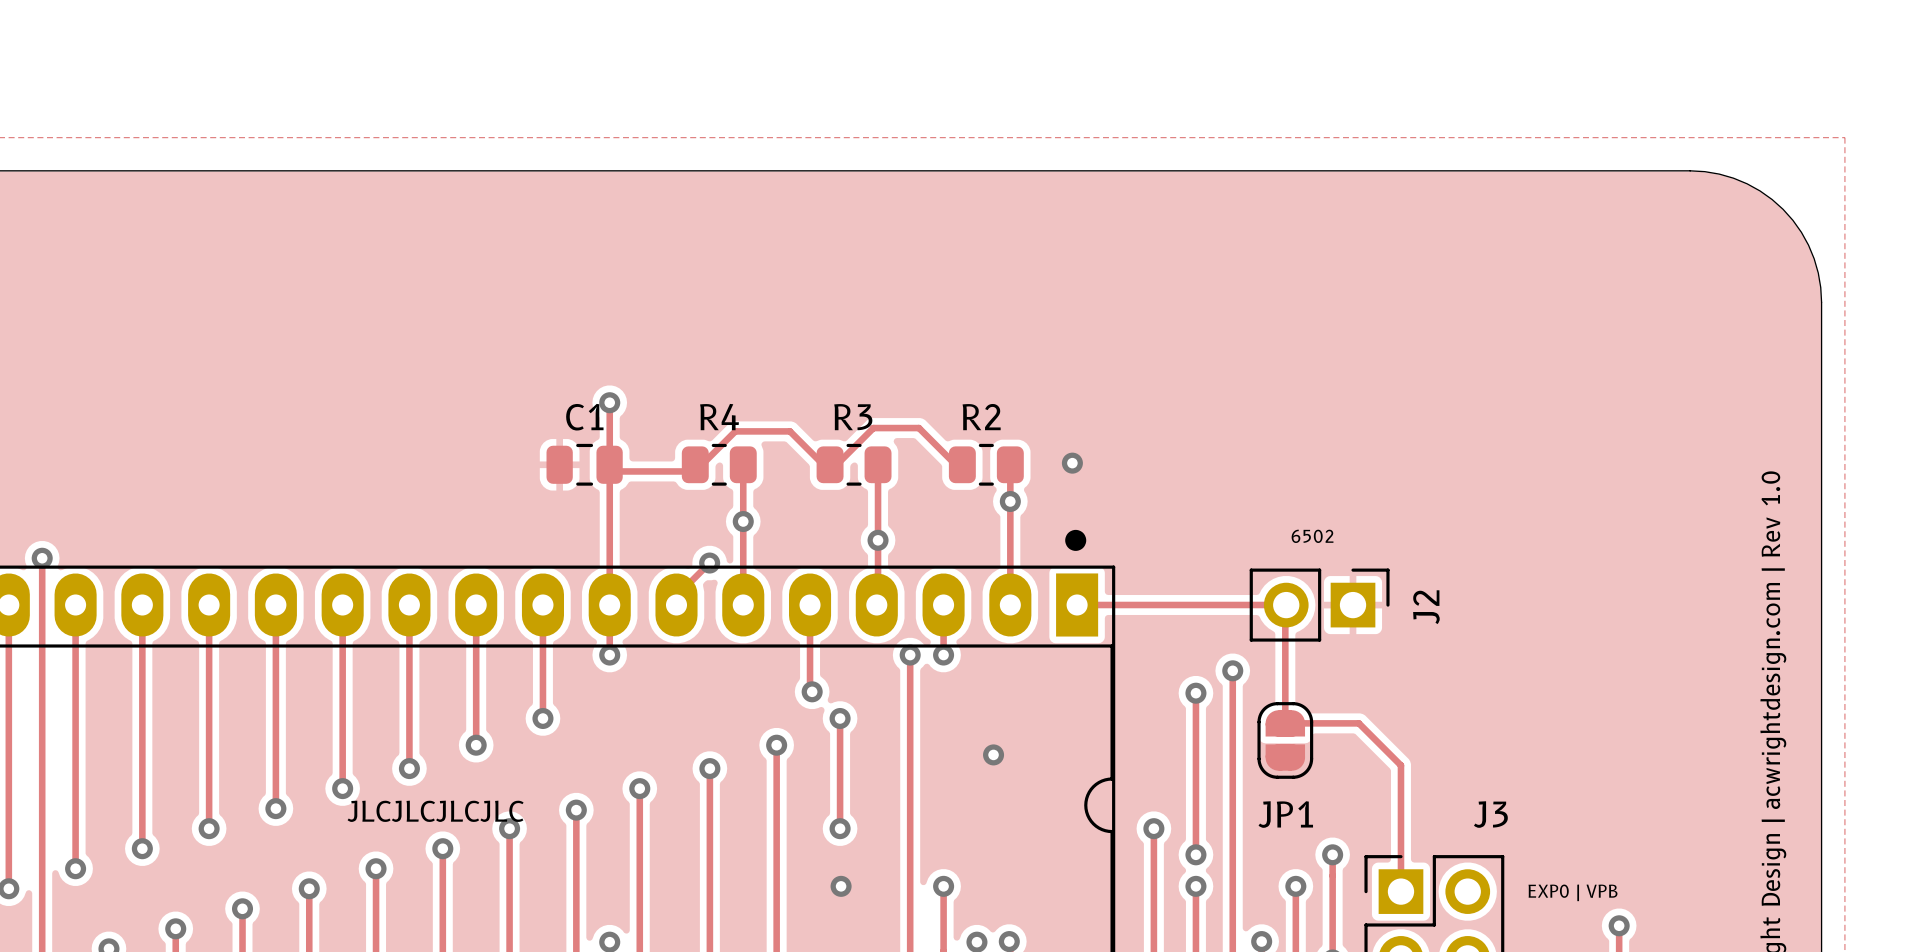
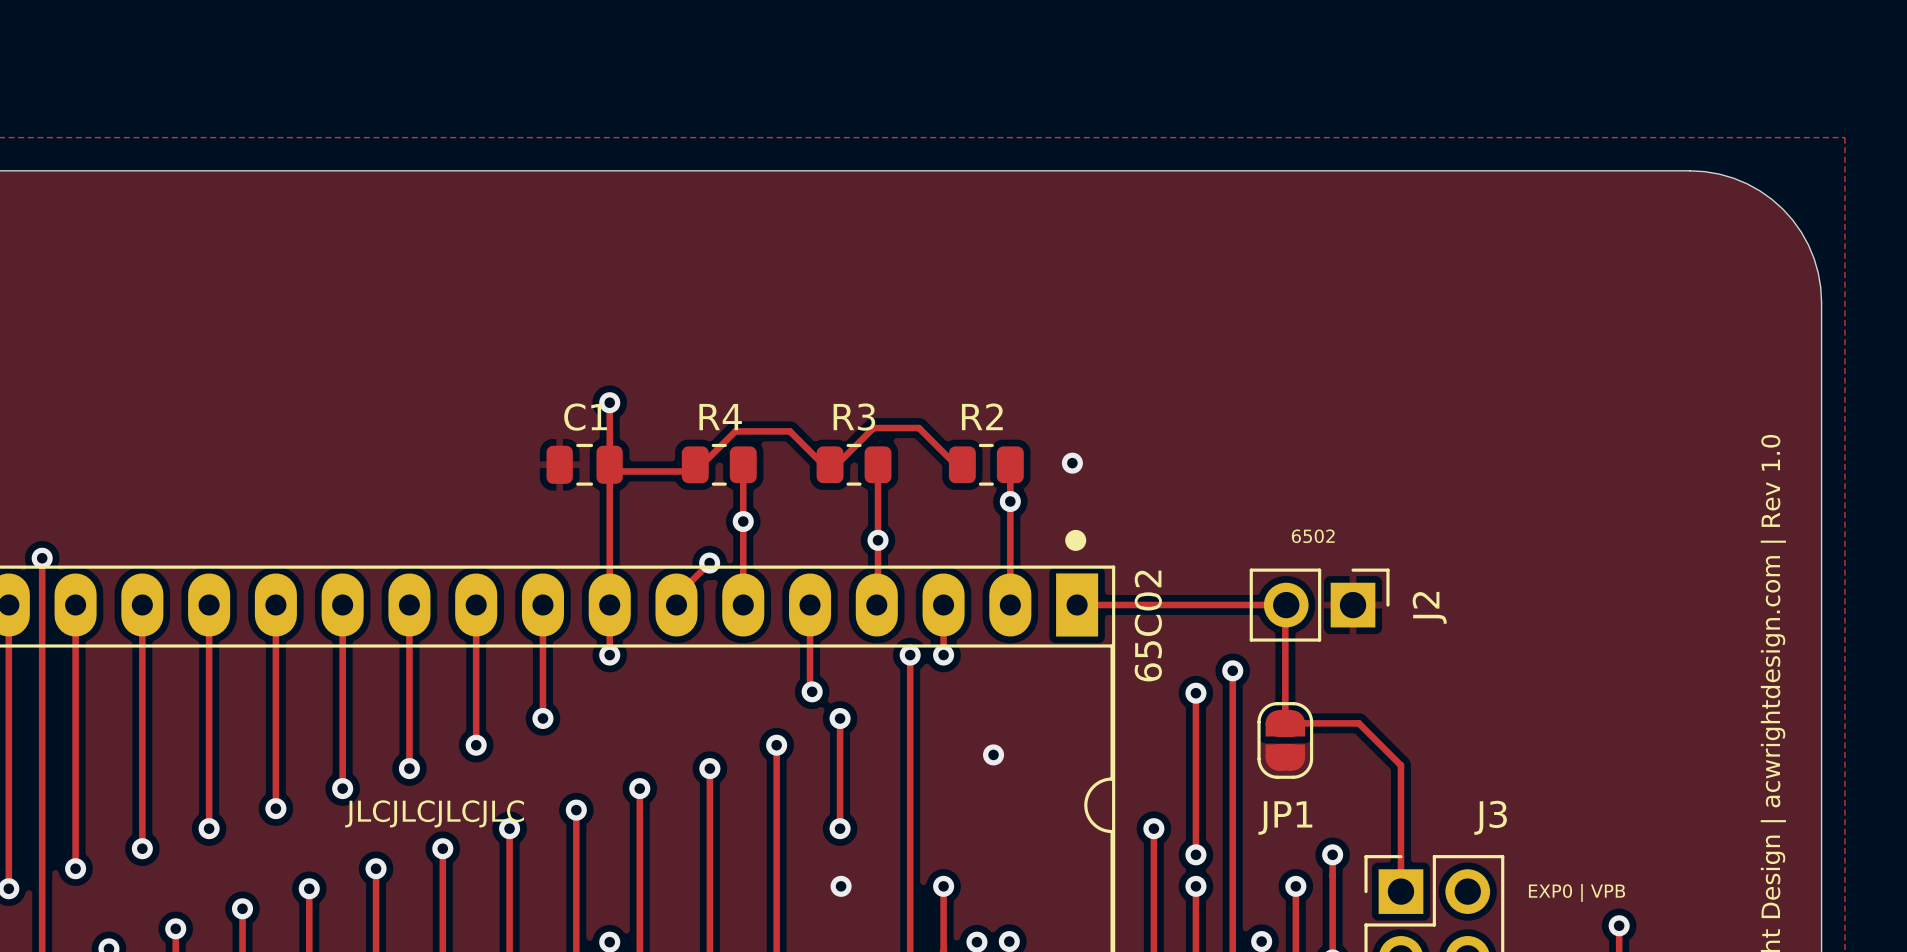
part value: none -> 65C02 (1148, 626)

